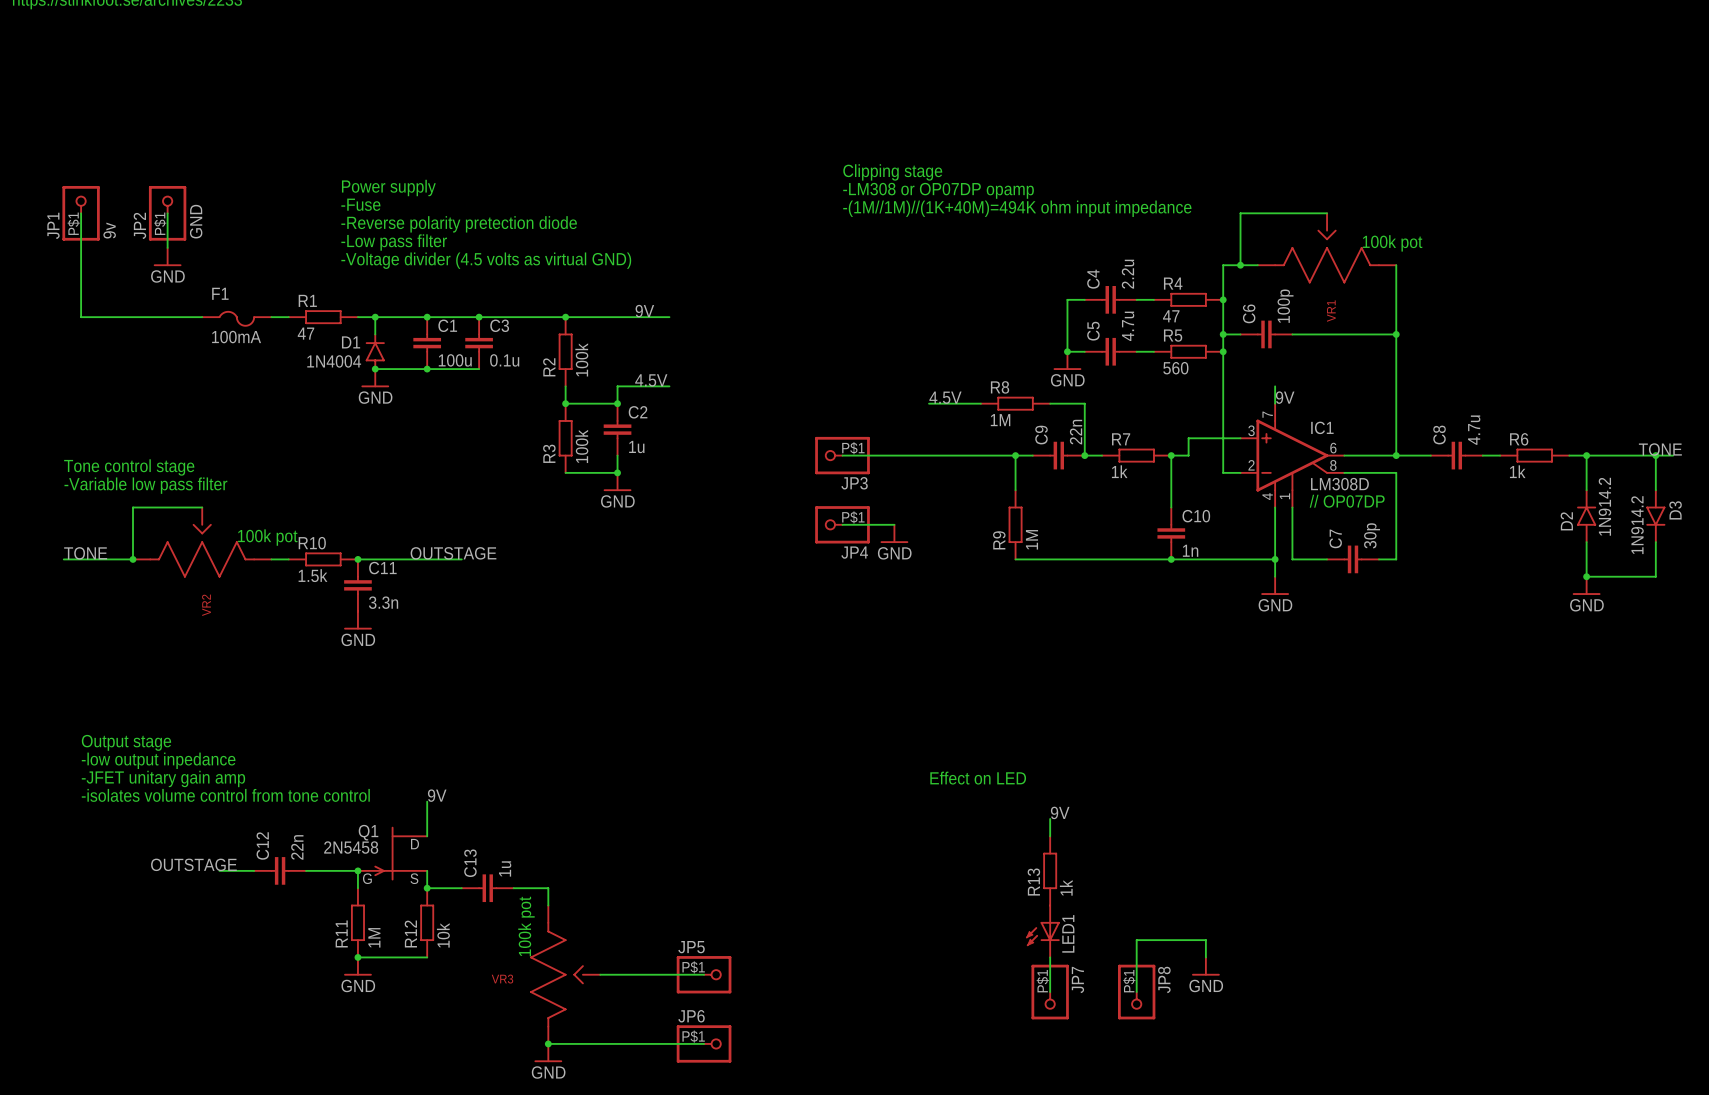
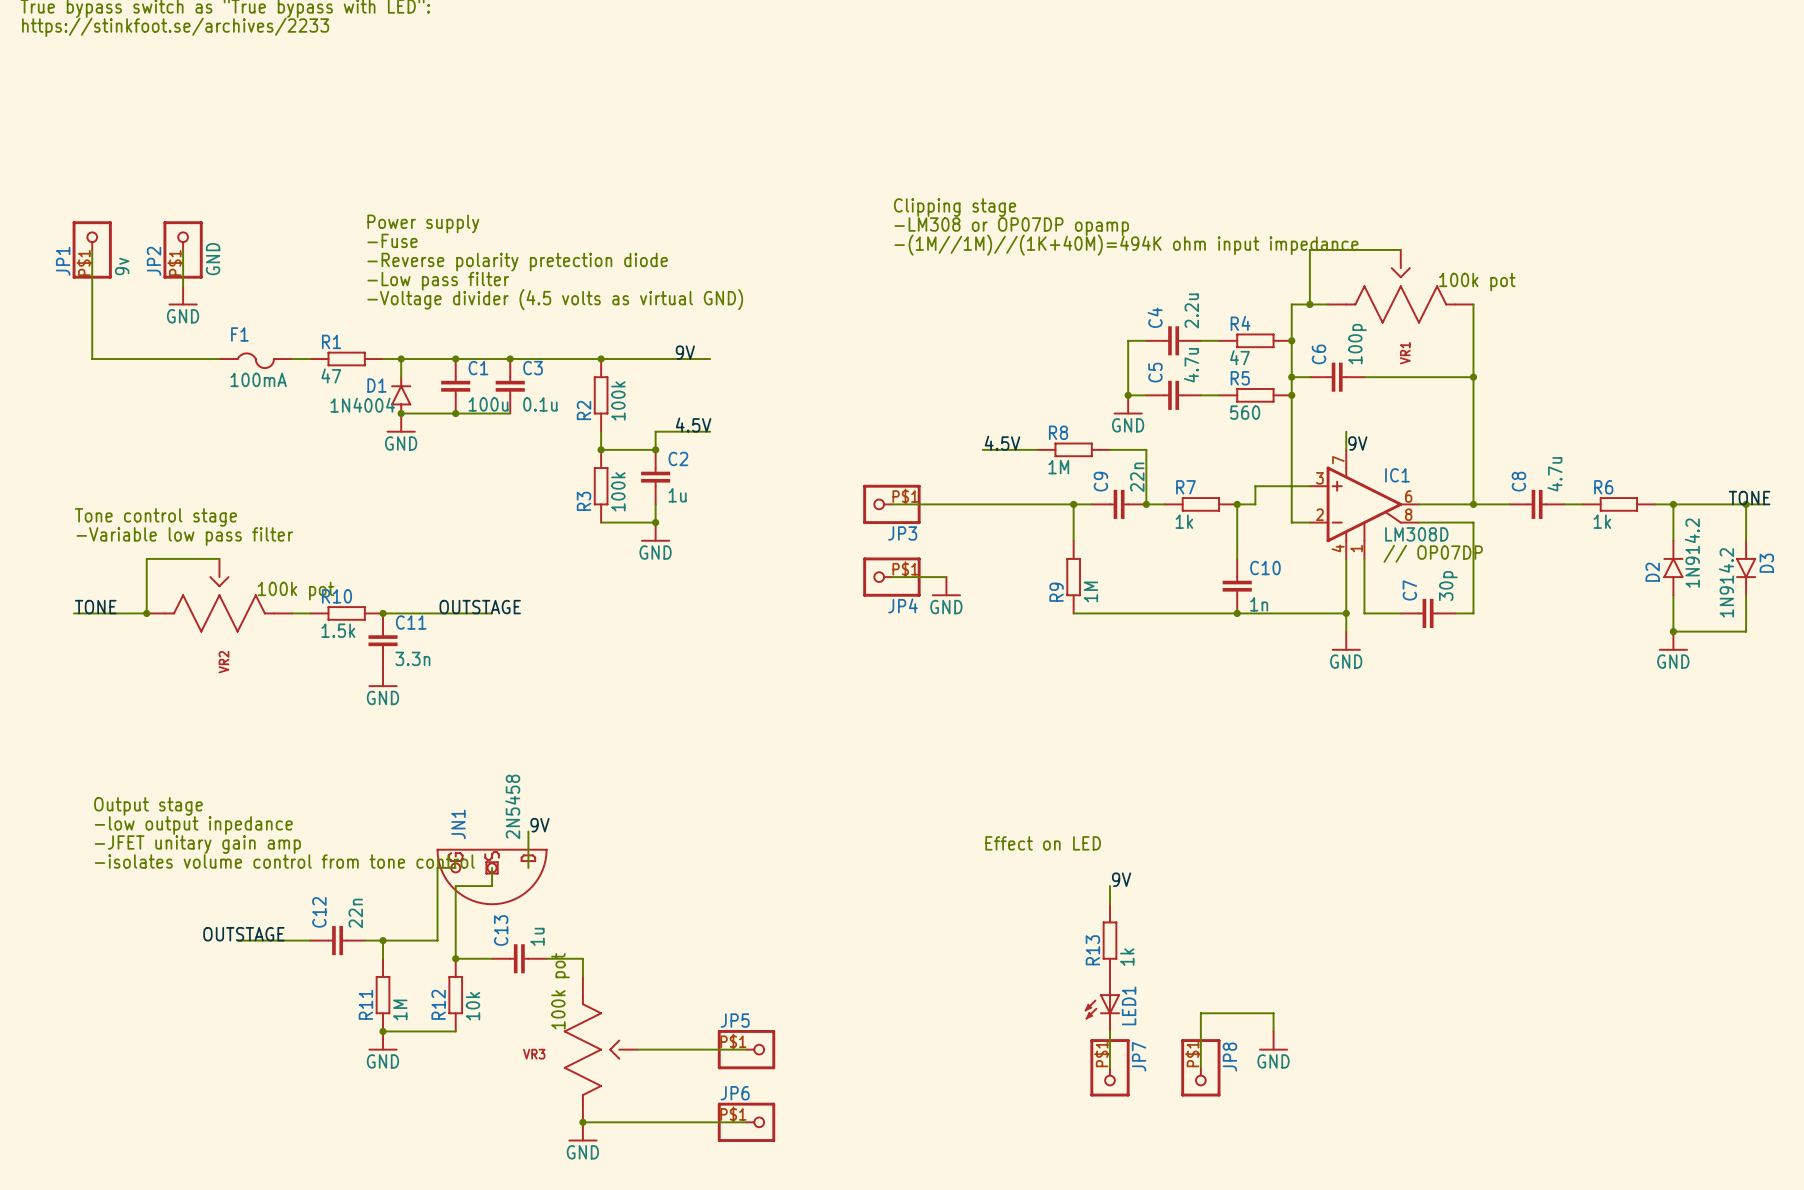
wire: none -> (528, 831) (528, 867)
label position: 9V (437, 795) -> 9V (539, 825)
wire: (427, 801) (427, 818) -> (492, 867) (492, 886) (455, 886)
wire: none -> (455, 867) (437, 867) (437, 940) (383, 940)
JN1: none -> 2N5458 (492, 876)
wire: none -> (455, 904) (455, 940)
Q1: 2N5458 (392, 853) -> none
label position: OUTSTAGE (193, 864) -> OUTSTAGE (243, 934)
C12 position: (280, 870) -> (337, 940)

